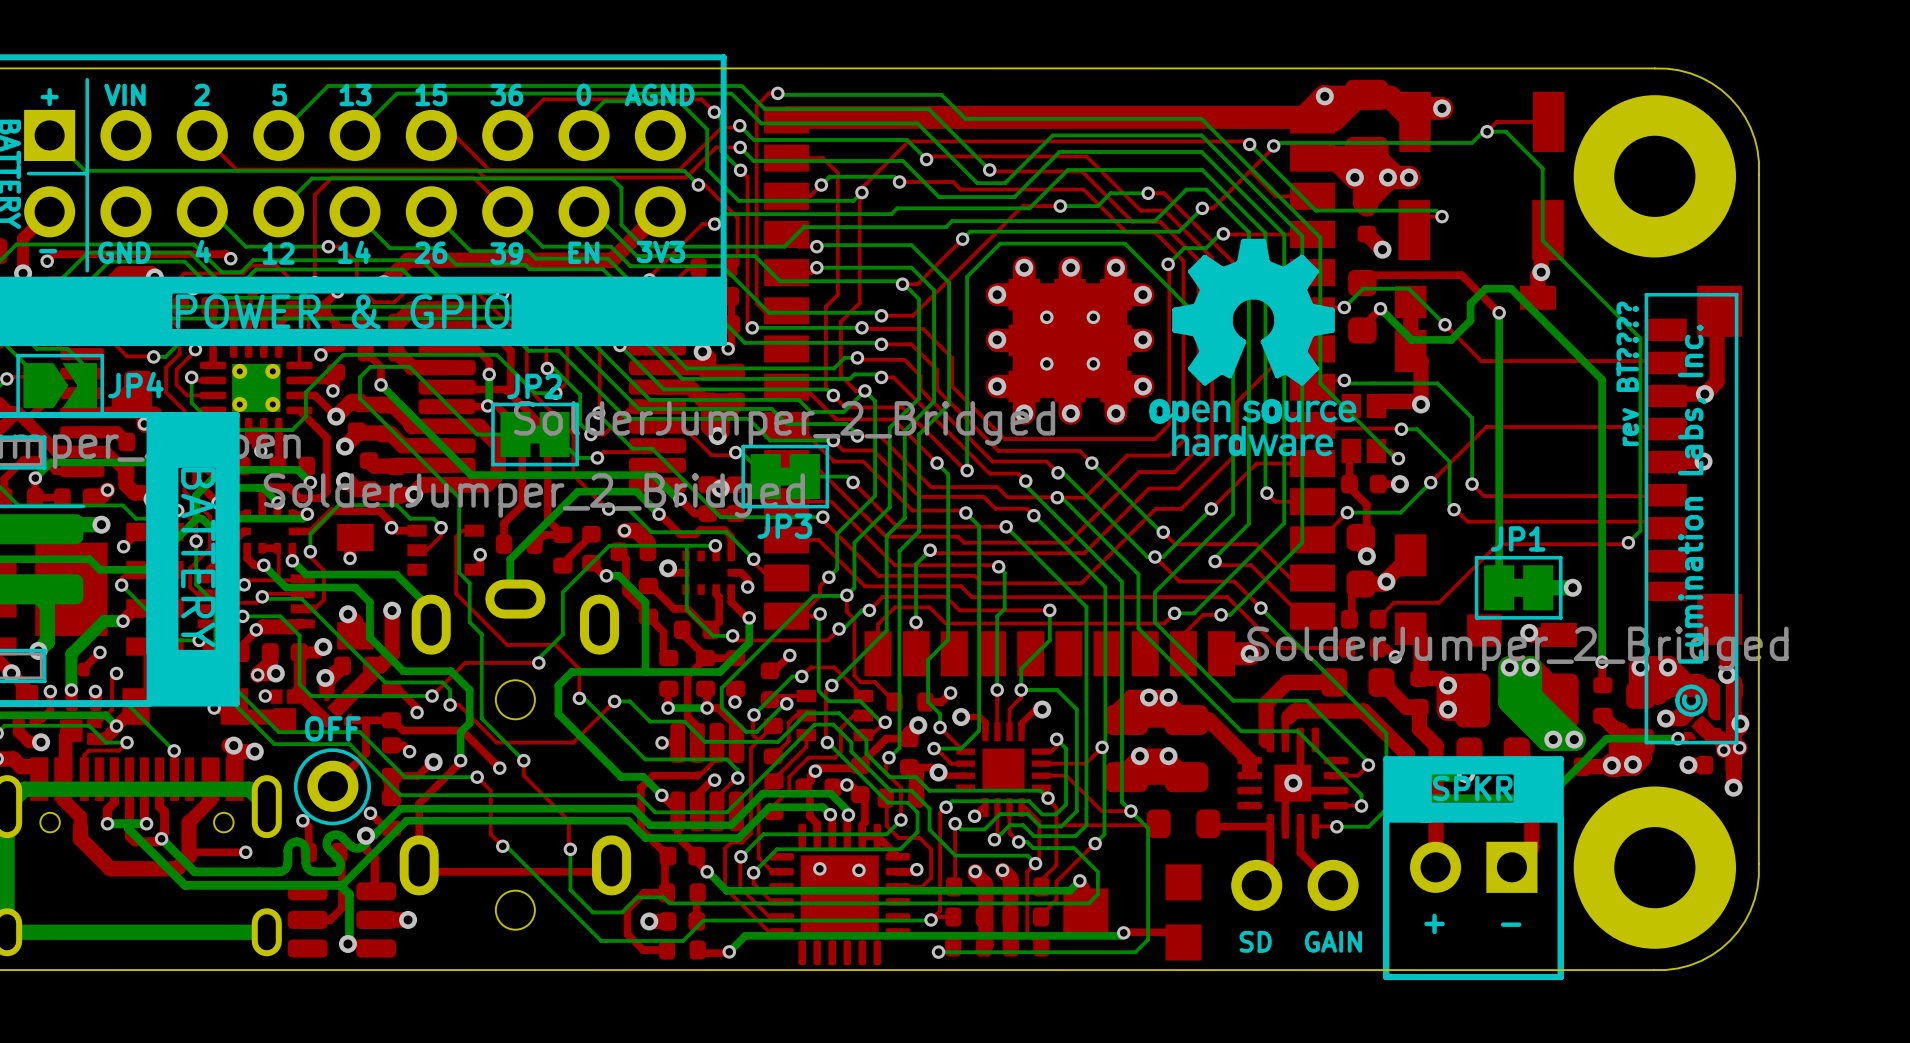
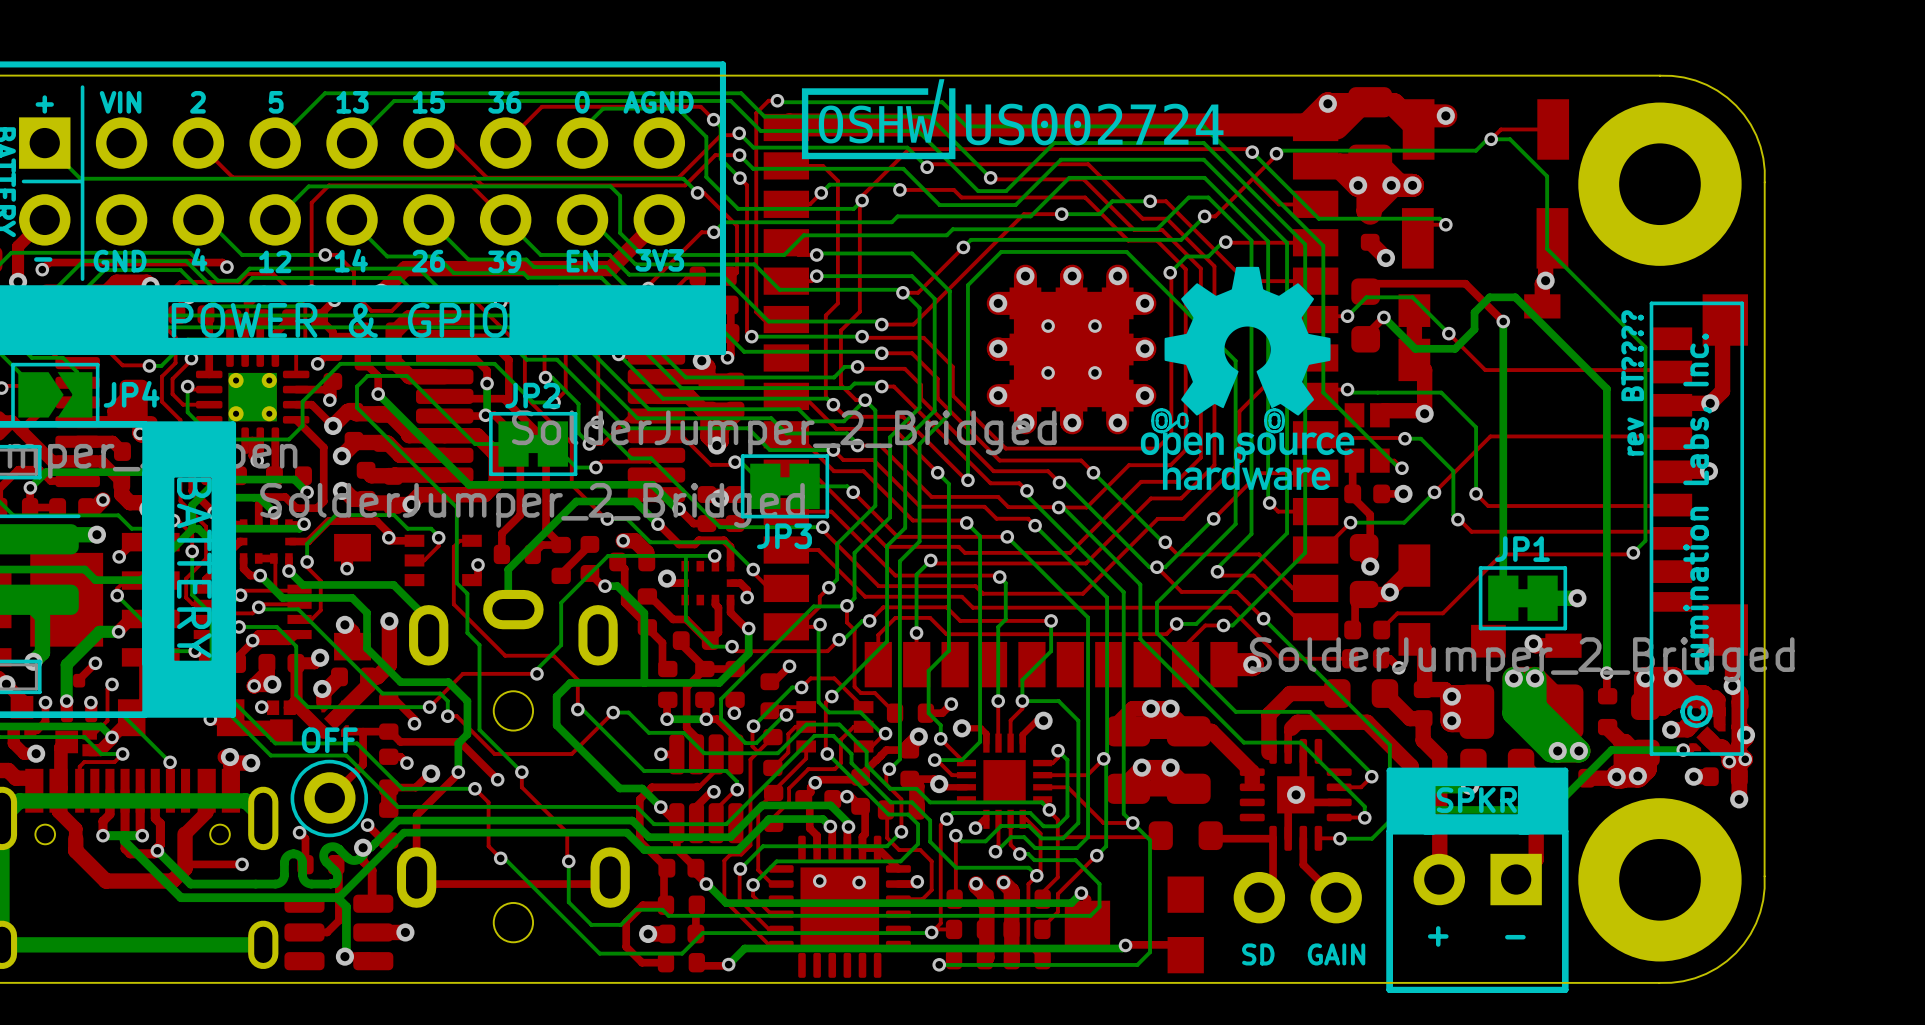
drawing: none -> [801, 79, 1224, 160]
drawing shape: [1173, 240, 1334, 385] -> [1164, 266, 1331, 416]
line: (1263, 240) (1242, 240) (1238, 262) (1223, 268) (1204, 256) (1189, 271) (1201, 289) (1195, 304) (1173, 309) (1173, 330) (1194, 335) (1200, 351) (1189, 368) (1204, 383) (1221, 373) (1230, 376) (1244, 341) (1233, 329) (1231, 315) (1236, 306) (1244, 299) (1253, 297) (1262, 299) (1269, 304) (1274, 311) (1275, 320) (1274, 328) (1262, 341) (1276, 376) (1285, 373) (1302, 383) (1317, 368) (1306, 351) (1312, 335) (1333, 330) (1333, 309) (1312, 305) (1305, 290) (1317, 270) (1302, 256) (1284, 268) (1269, 262) (1263, 240) -> none
drawing: [1150, 400, 1357, 457] -> none
drawing: none -> [1140, 432, 1355, 491]
drawing shape: [1228, 425, 1246, 457] -> [1235, 432, 1255, 456]
drawing shape: [1248, 434, 1279, 456] -> [1257, 432, 1276, 456]
drawing shape: [1278, 434, 1297, 457] -> [1279, 432, 1298, 456]

